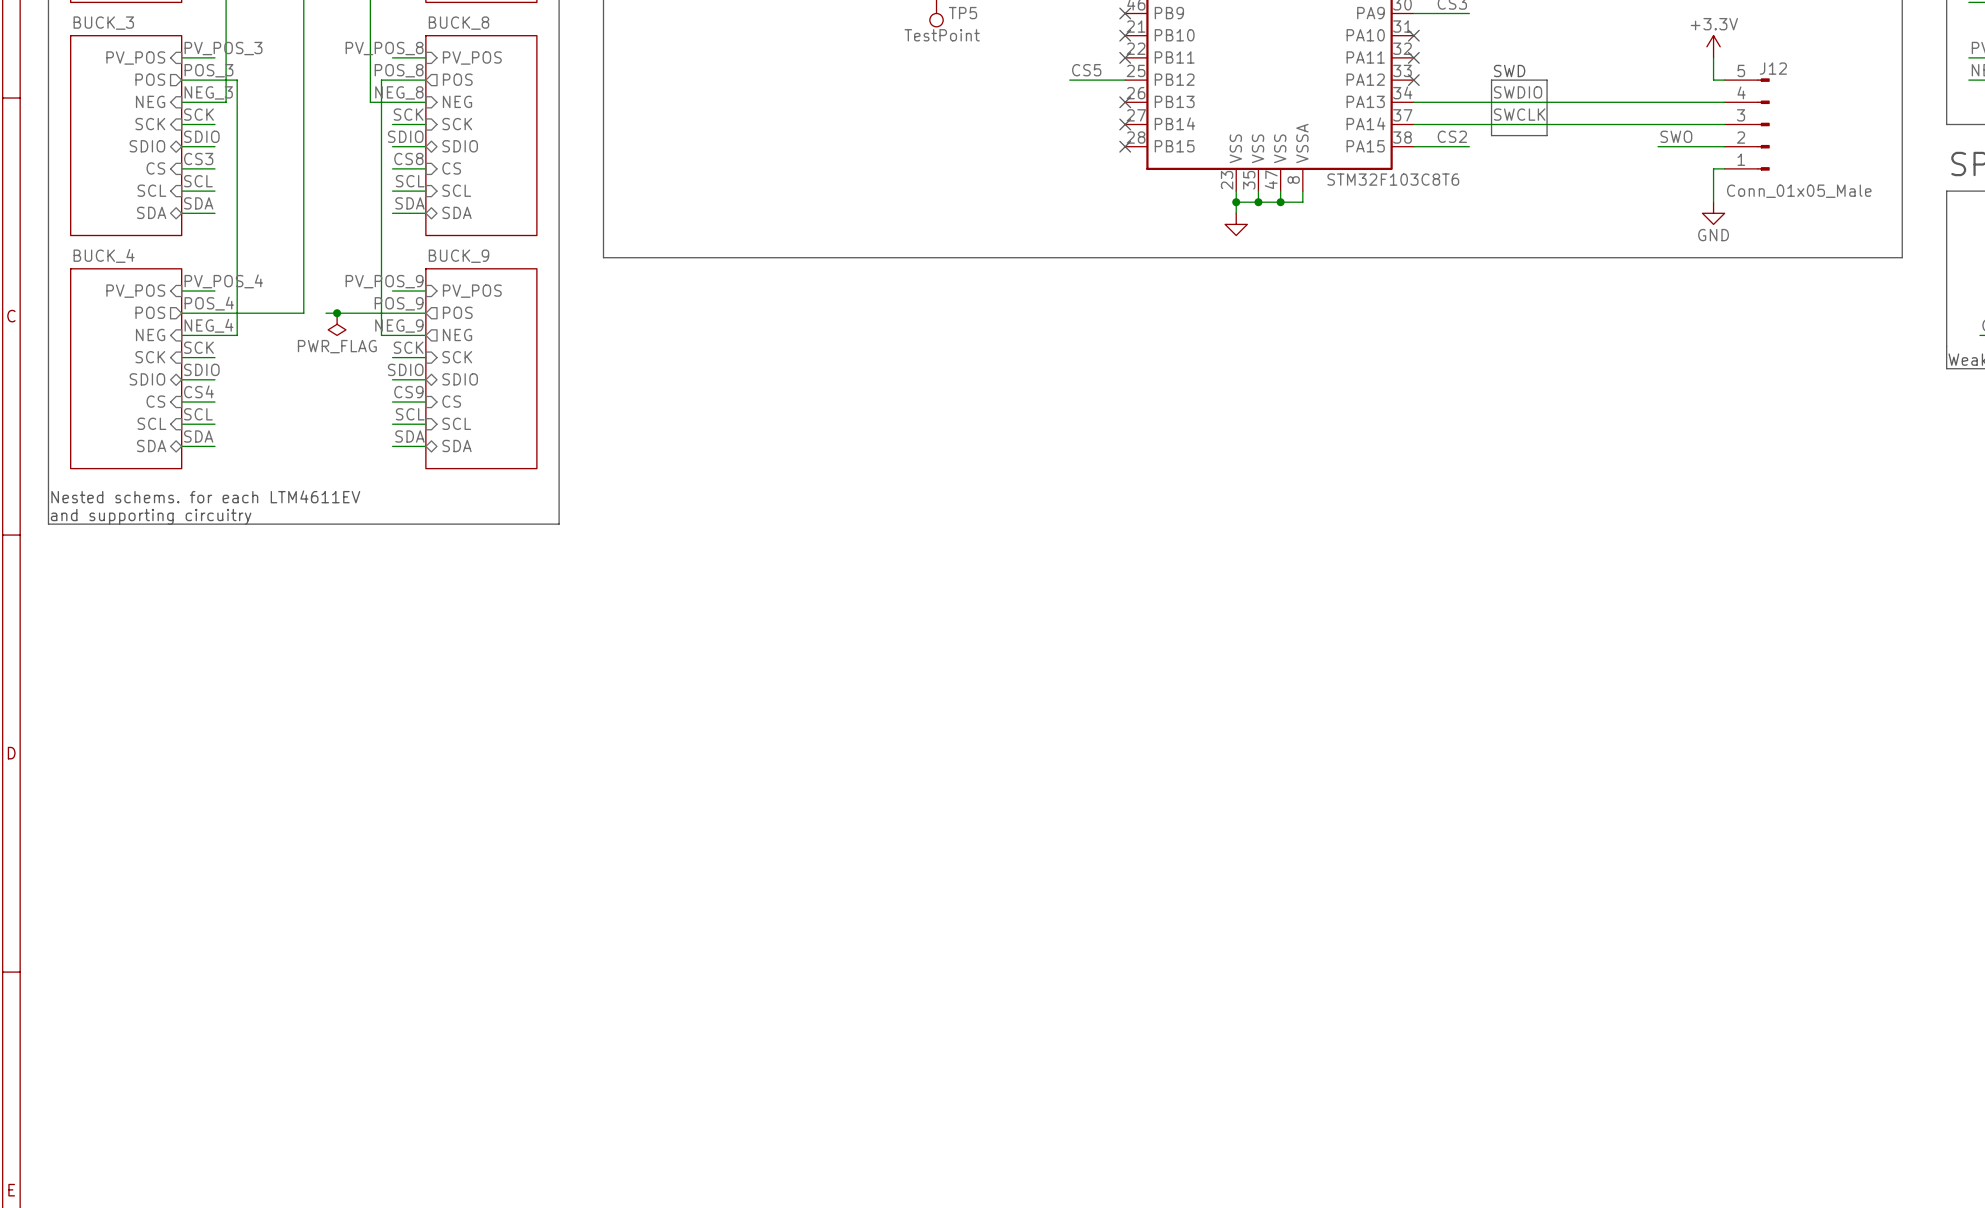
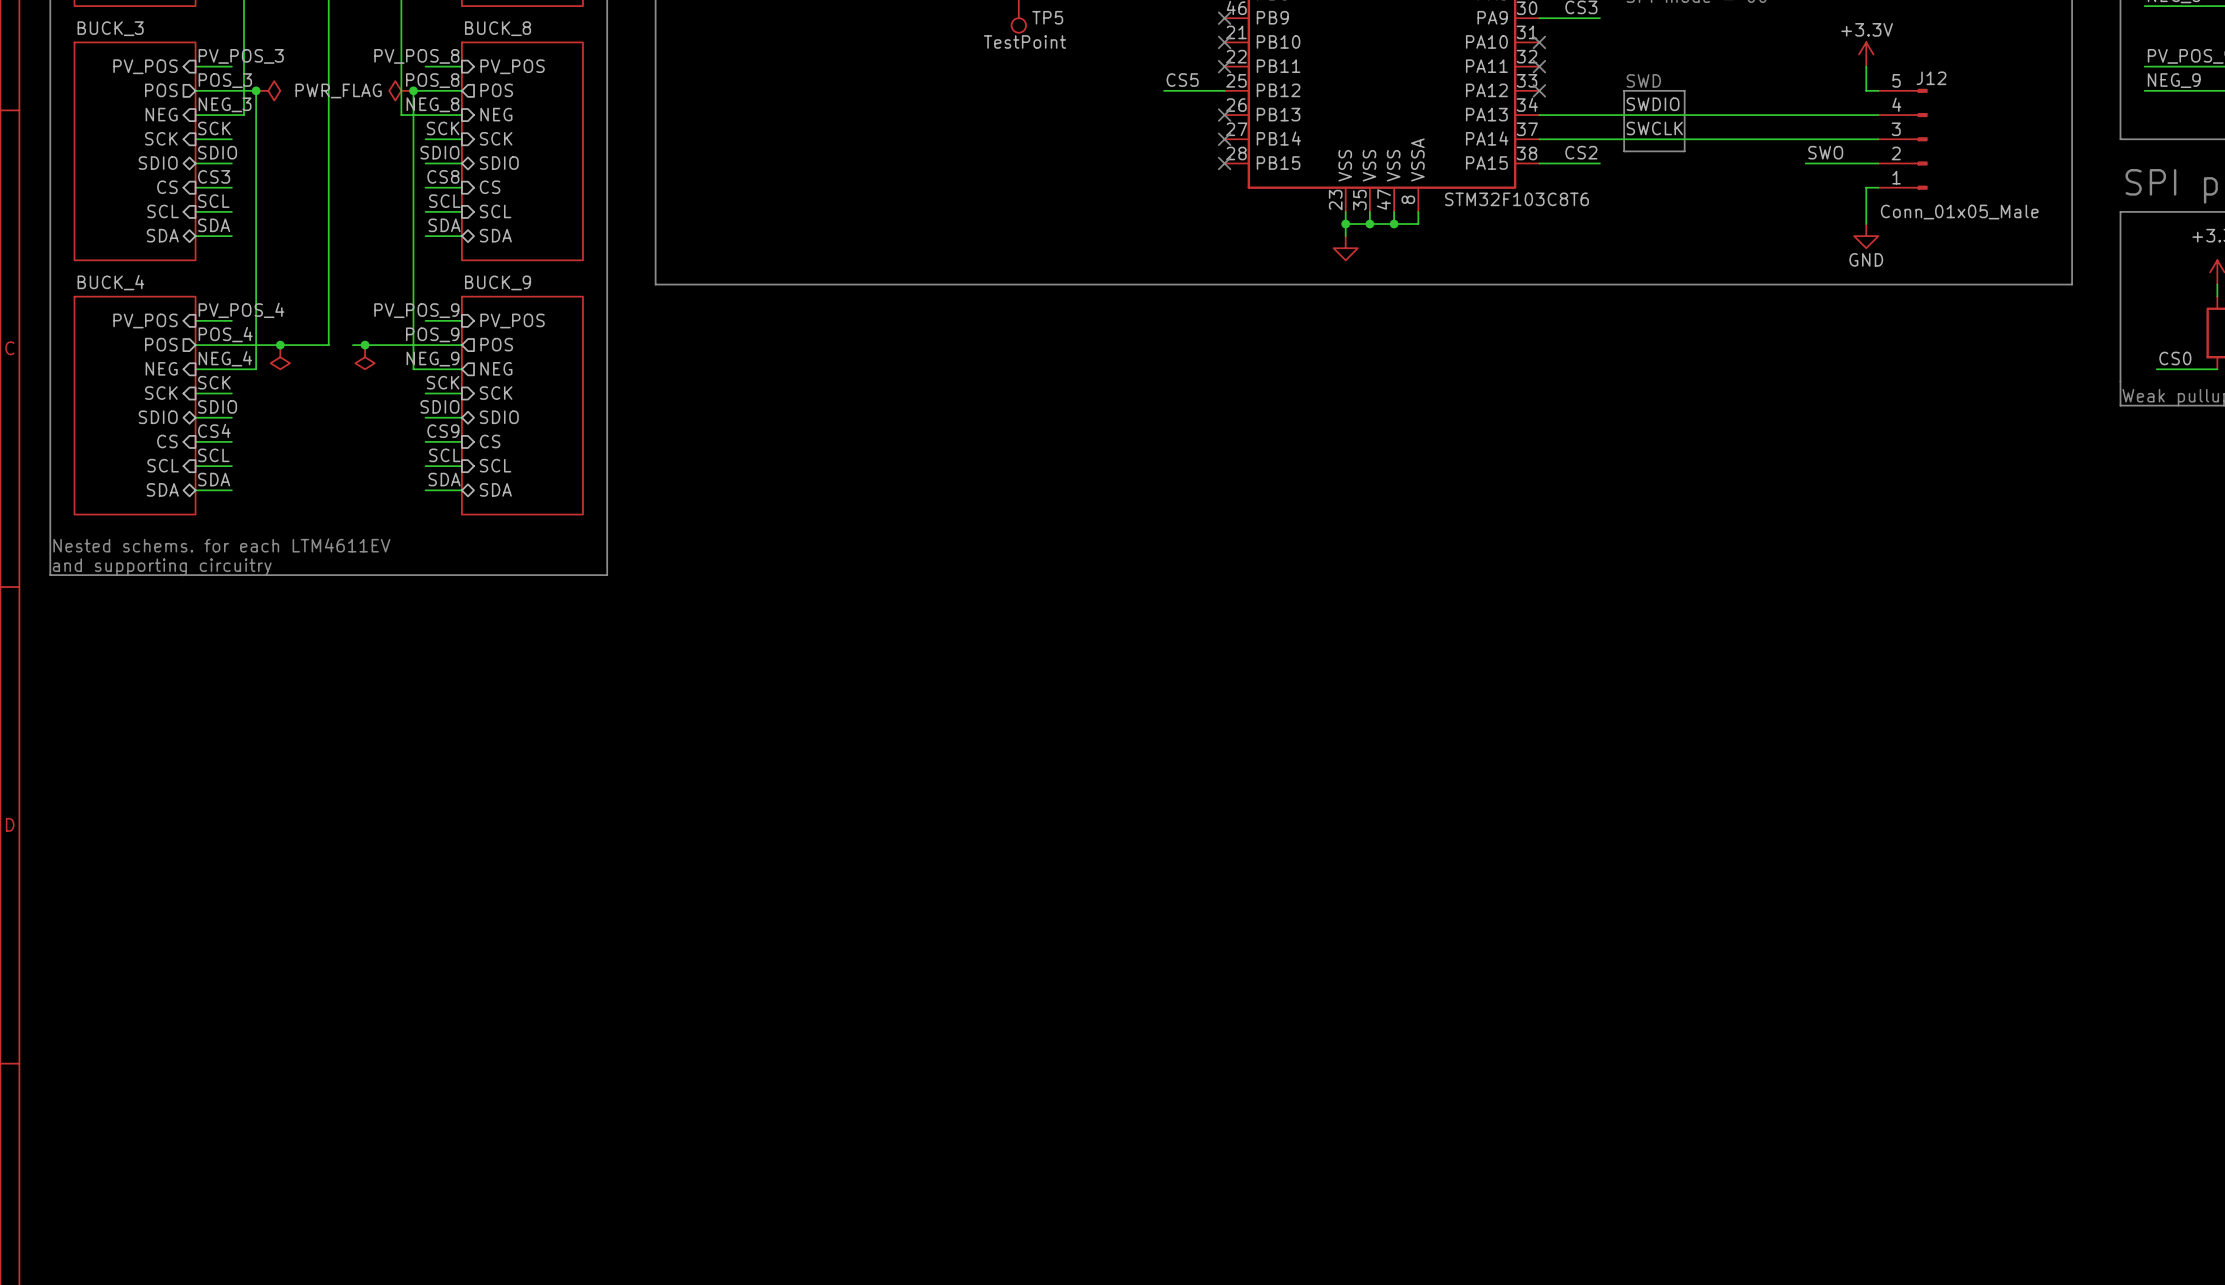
junction: none -> (256, 90)
power symbol: none -> PWR_FLAG (268, 90)
power symbol: none -> (401, 90)
junction: none -> (413, 90)
junction: none -> (280, 345)
power symbol: none -> (280, 357)
power symbol text: PWR_FLAG (337, 346) -> none

